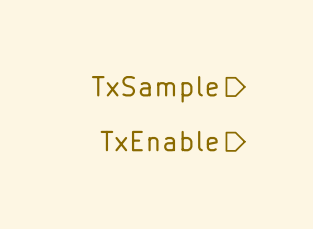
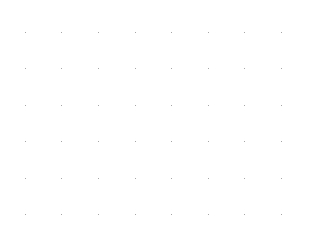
hierarchical label: TxSample (154, 89) -> none
hierarchical label: TxEnable (159, 141) -> none

